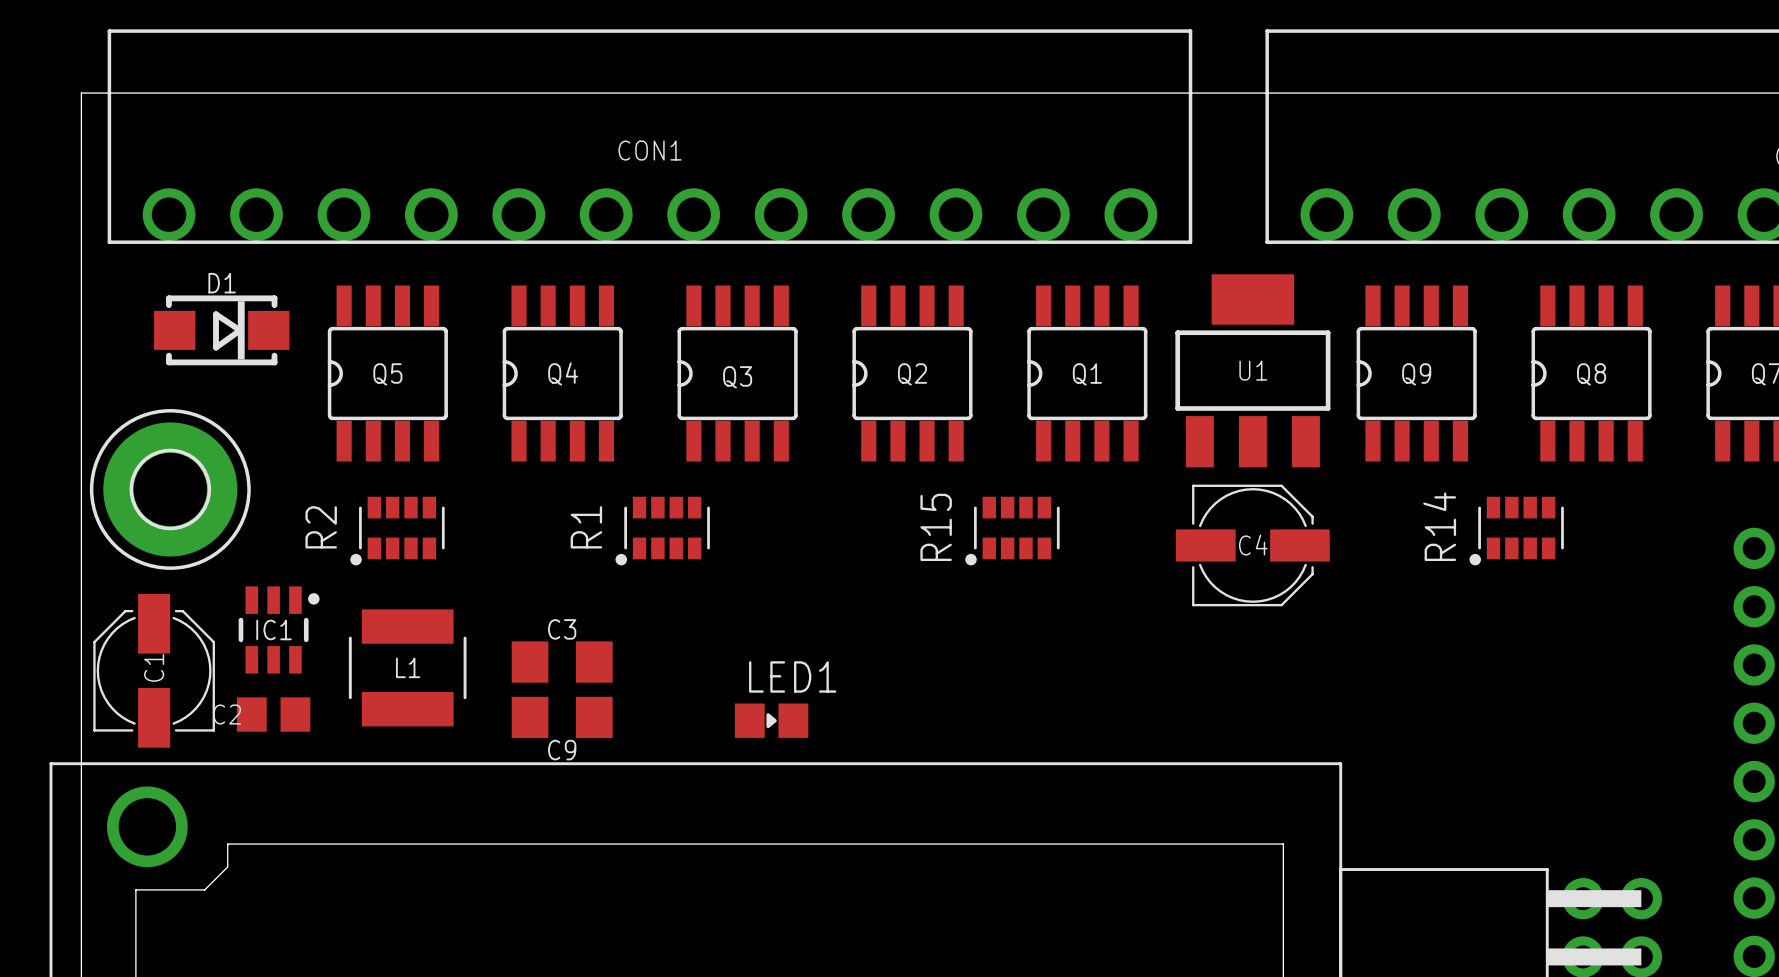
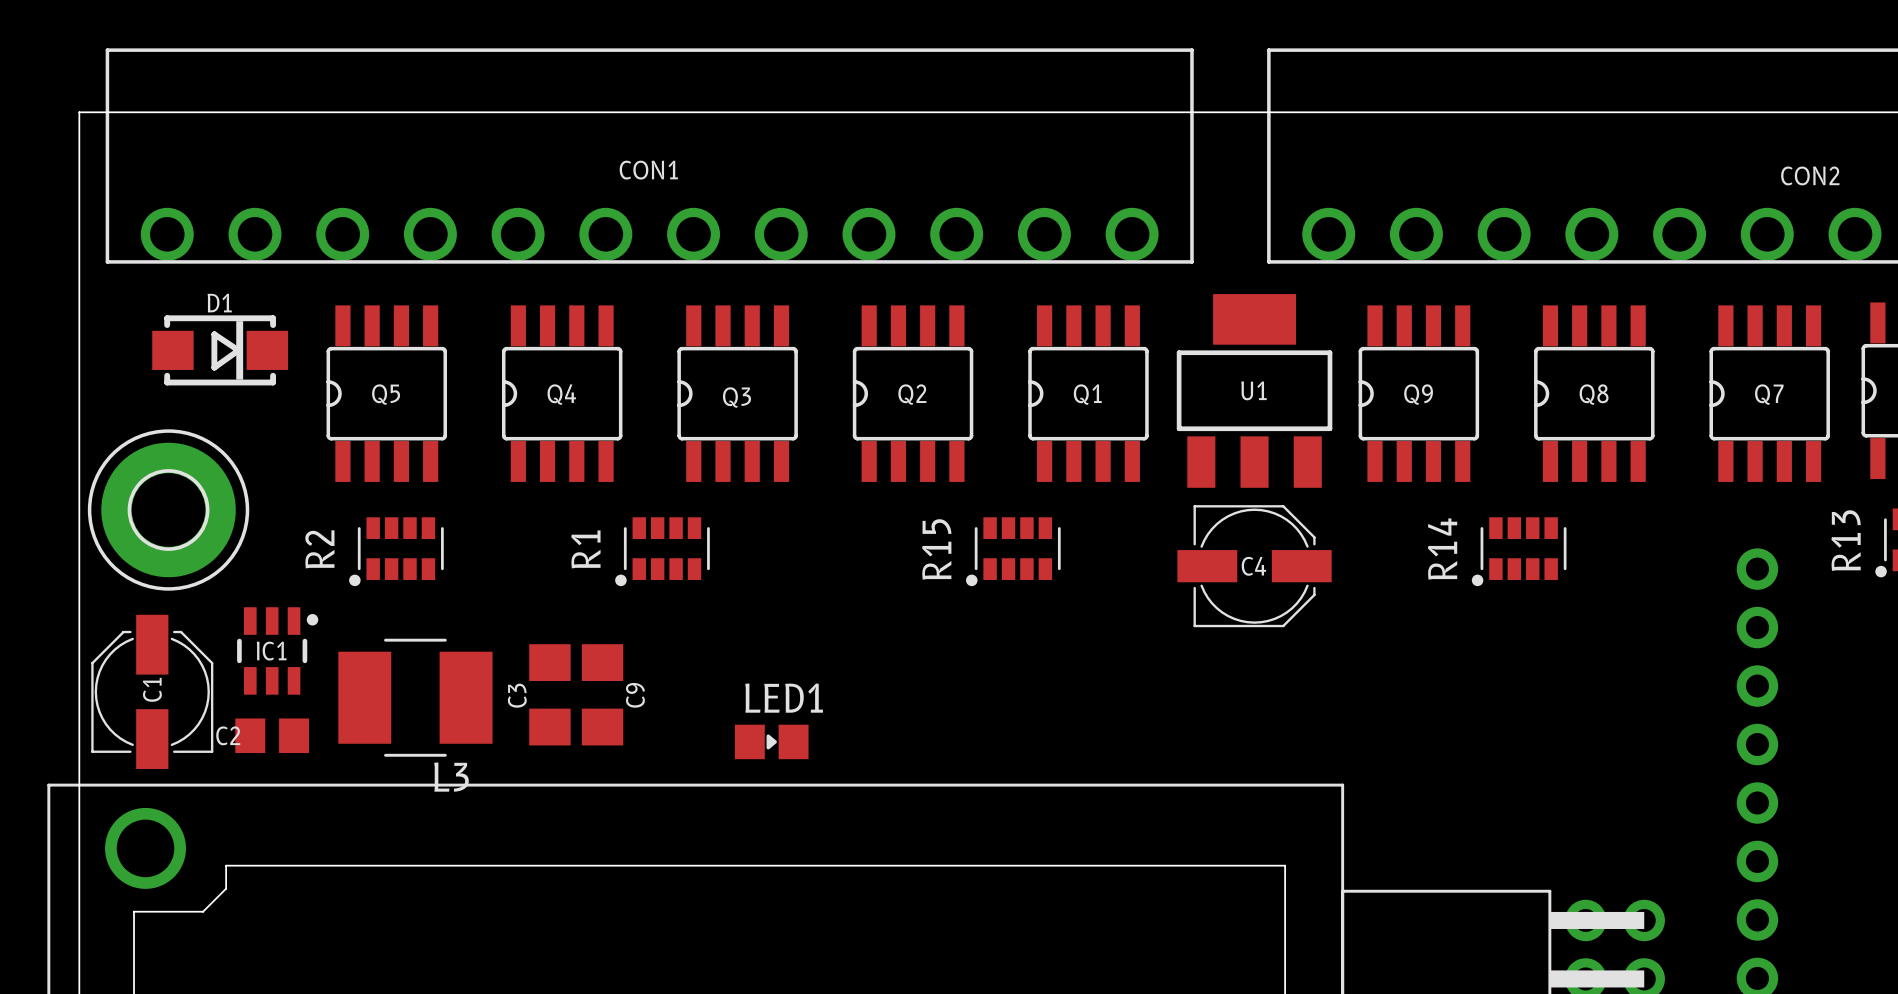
C3 rotation: 0° (562, 662) -> 90° clockwise (549, 694)
L1: (407, 667) -> none
L3: none -> (415, 697)
C9 rotation: 0° (562, 717) -> 90° clockwise (602, 694)
C9 name position: C9 (562, 750) -> C9 (635, 695)

